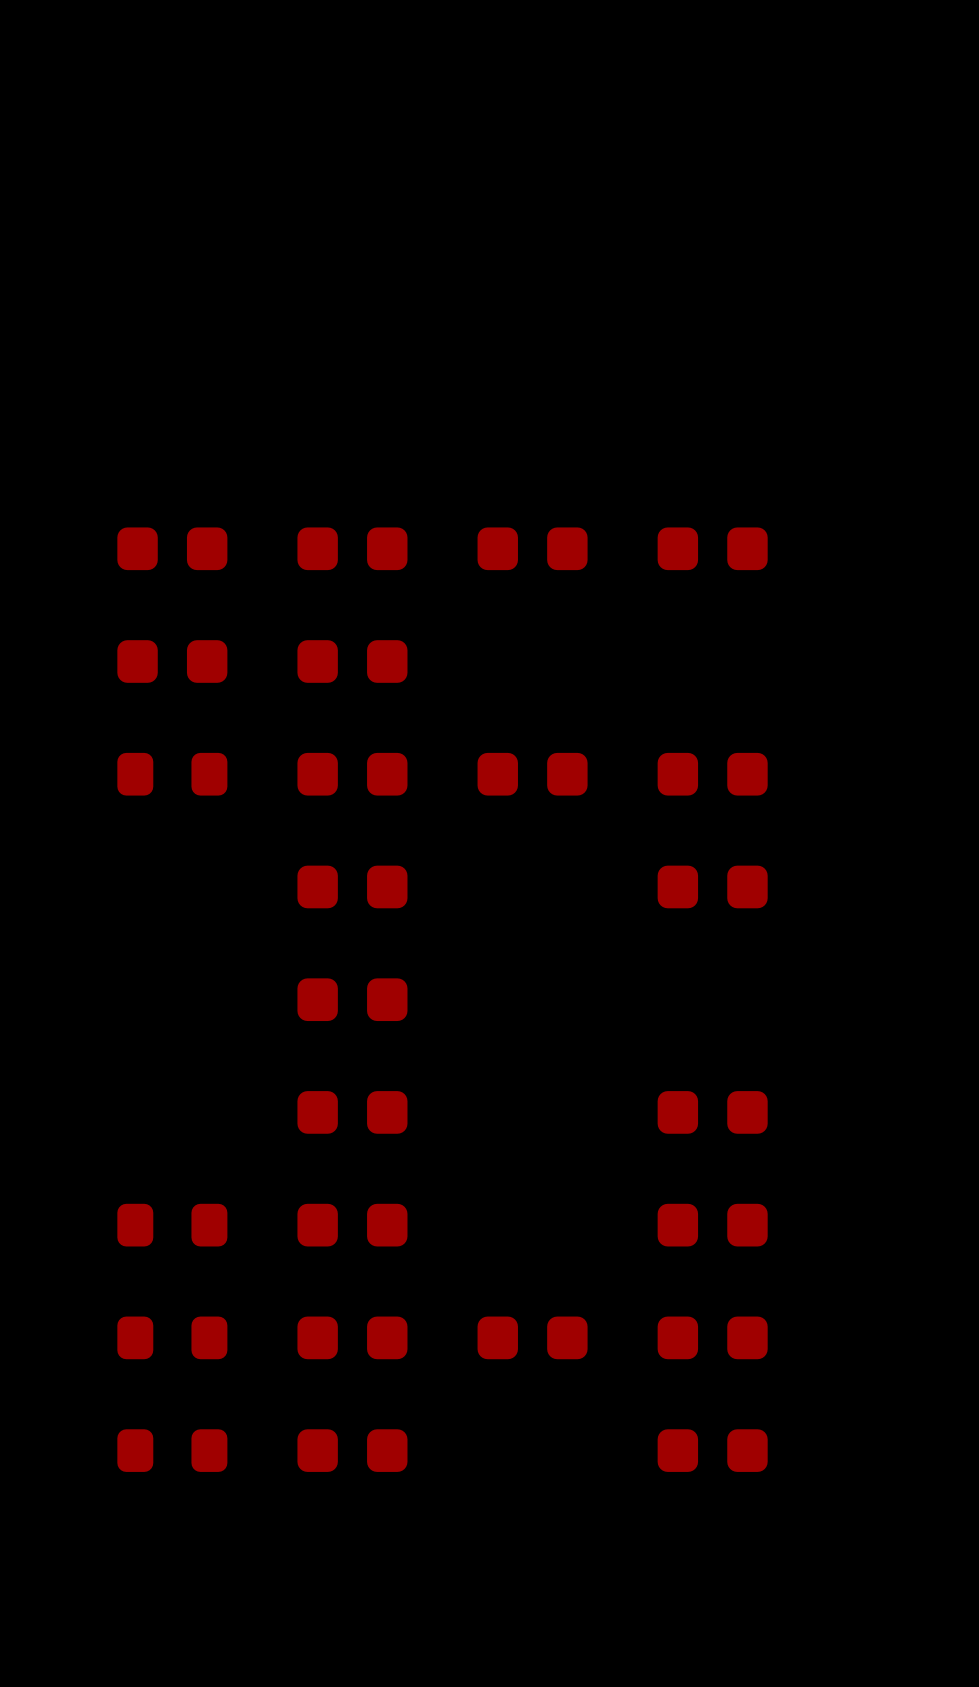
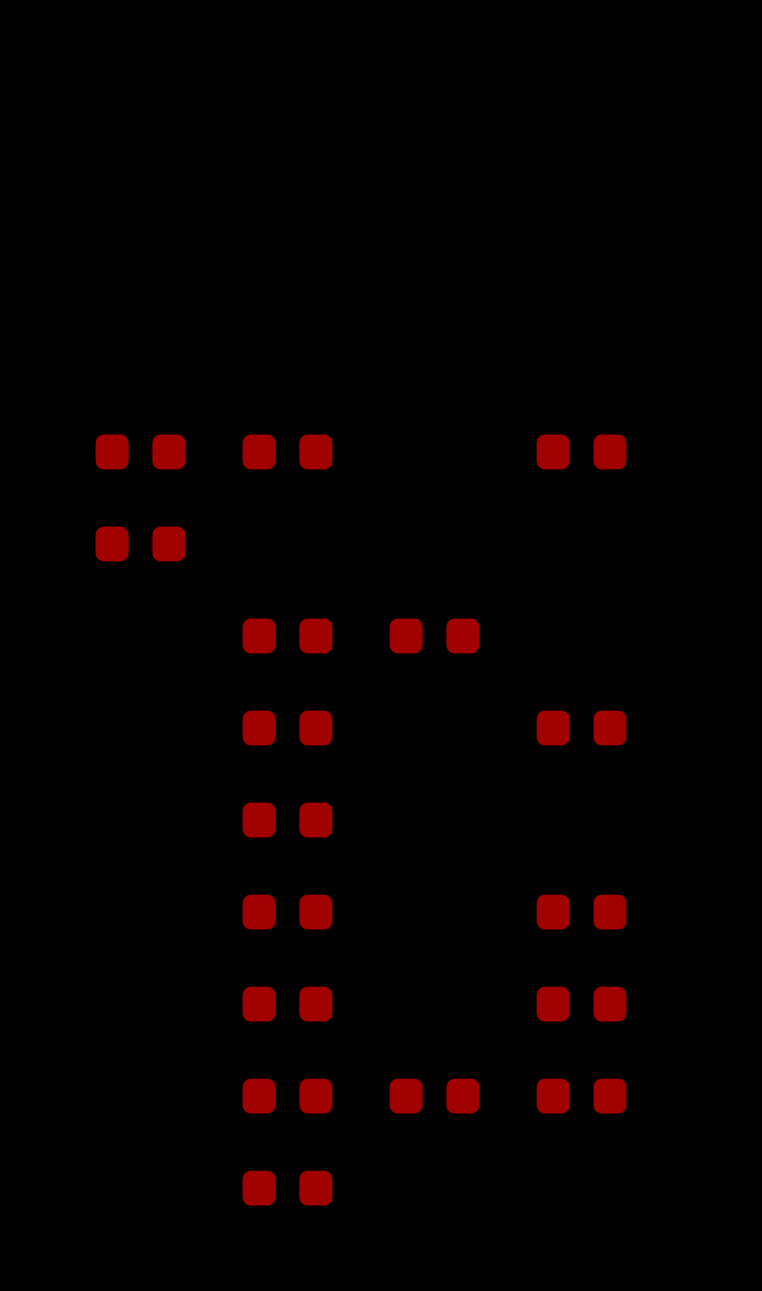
part: (532, 548) -> none
part: (352, 661) -> none
part: (172, 774) -> none
part: (712, 774) -> none
part: (172, 1225) -> none
part: (172, 1337) -> none
part: (172, 1450) -> none
part: (712, 1450) -> none

